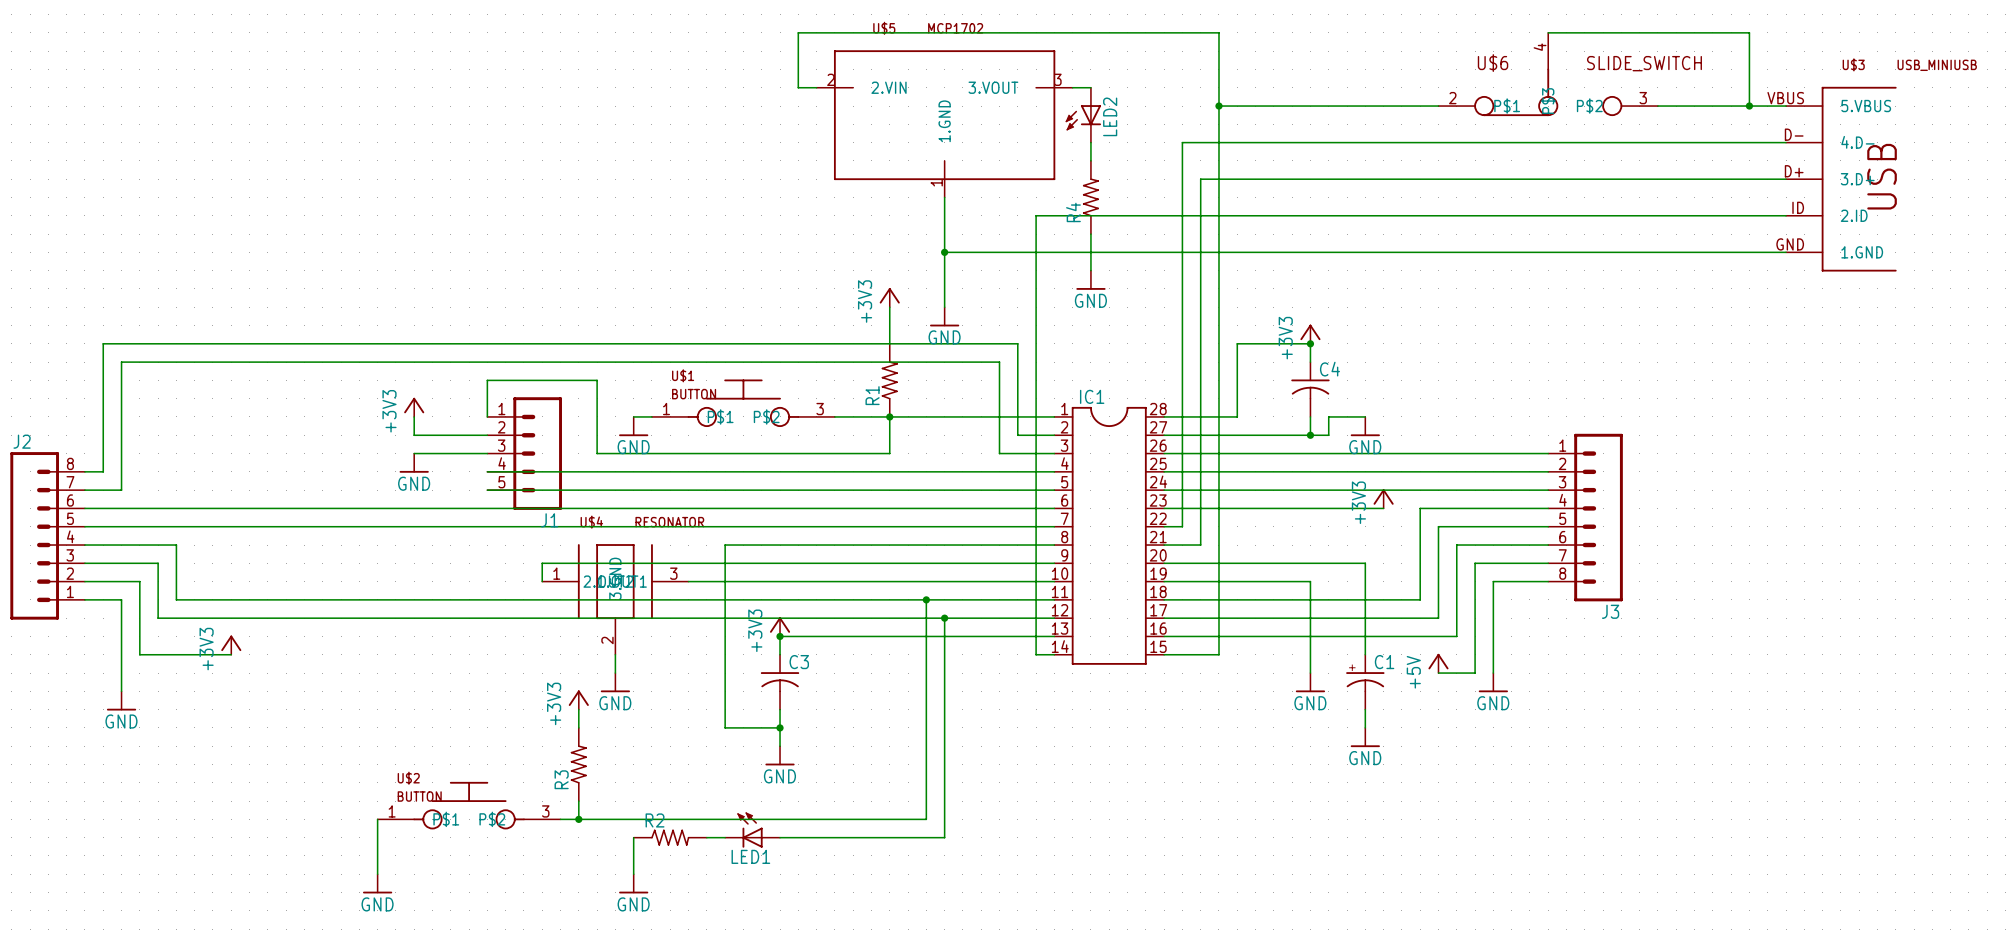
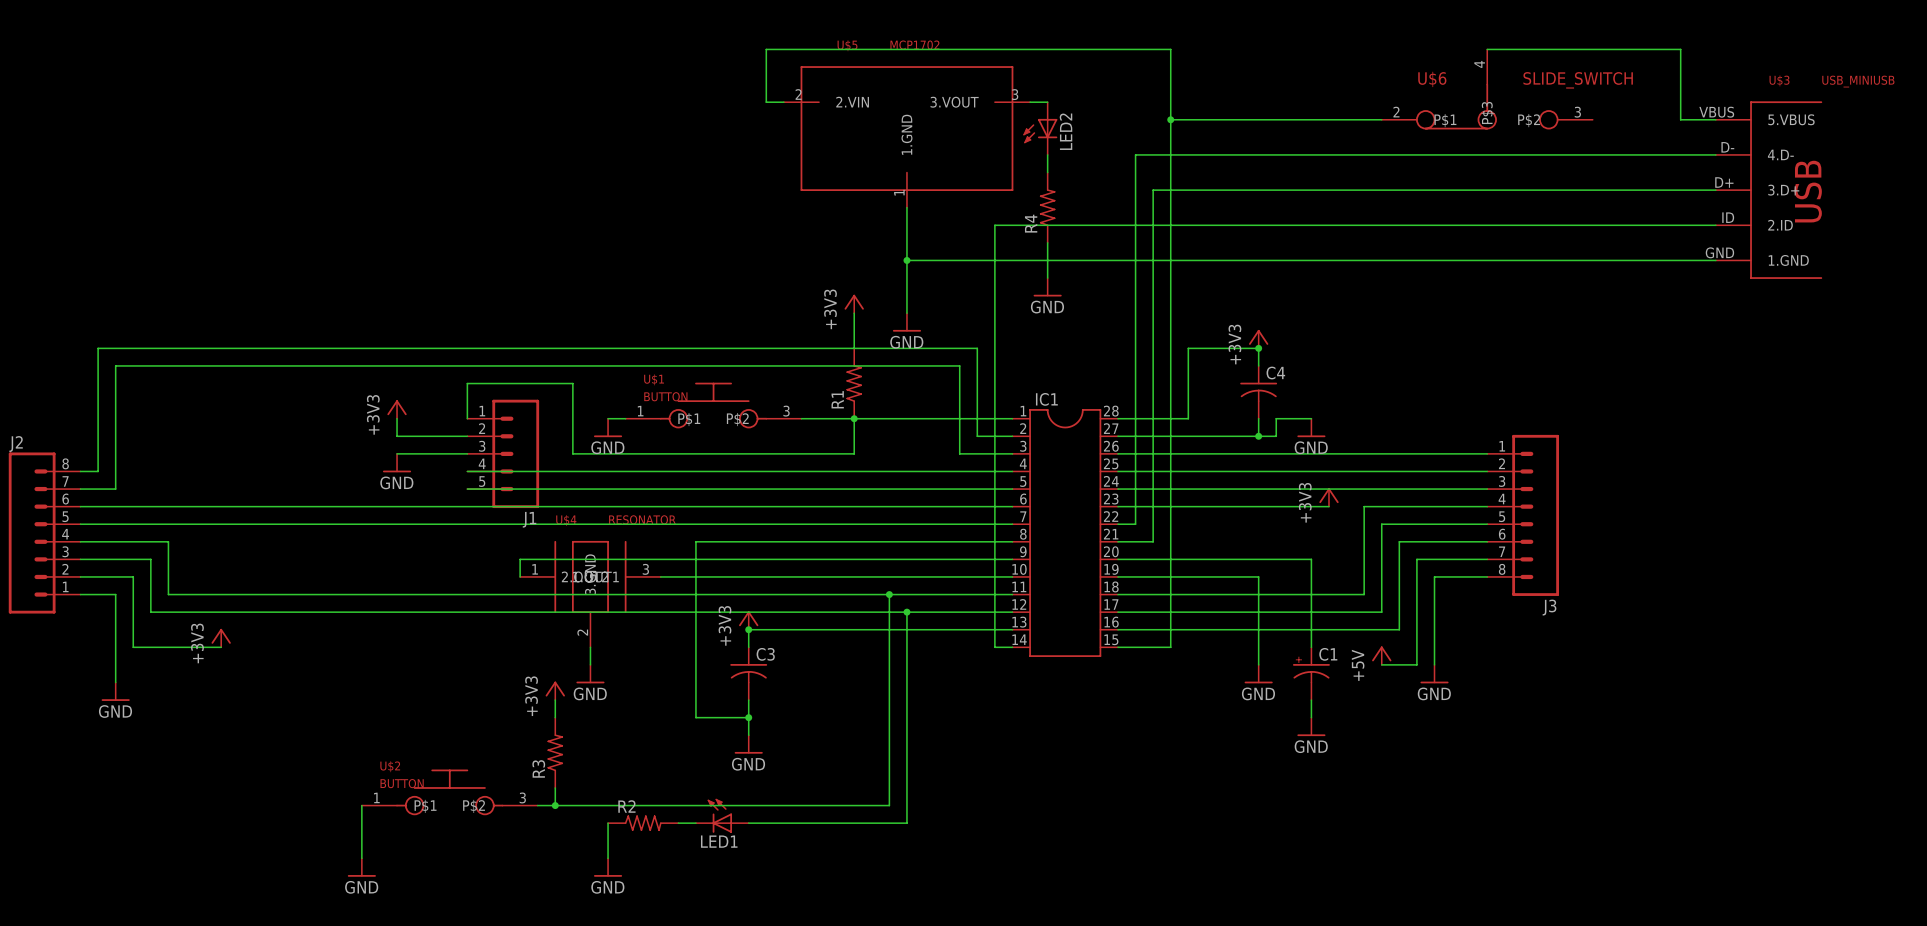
wire: (1657, 106) (1749, 106) -> none
junction: (1749, 106) -> none

